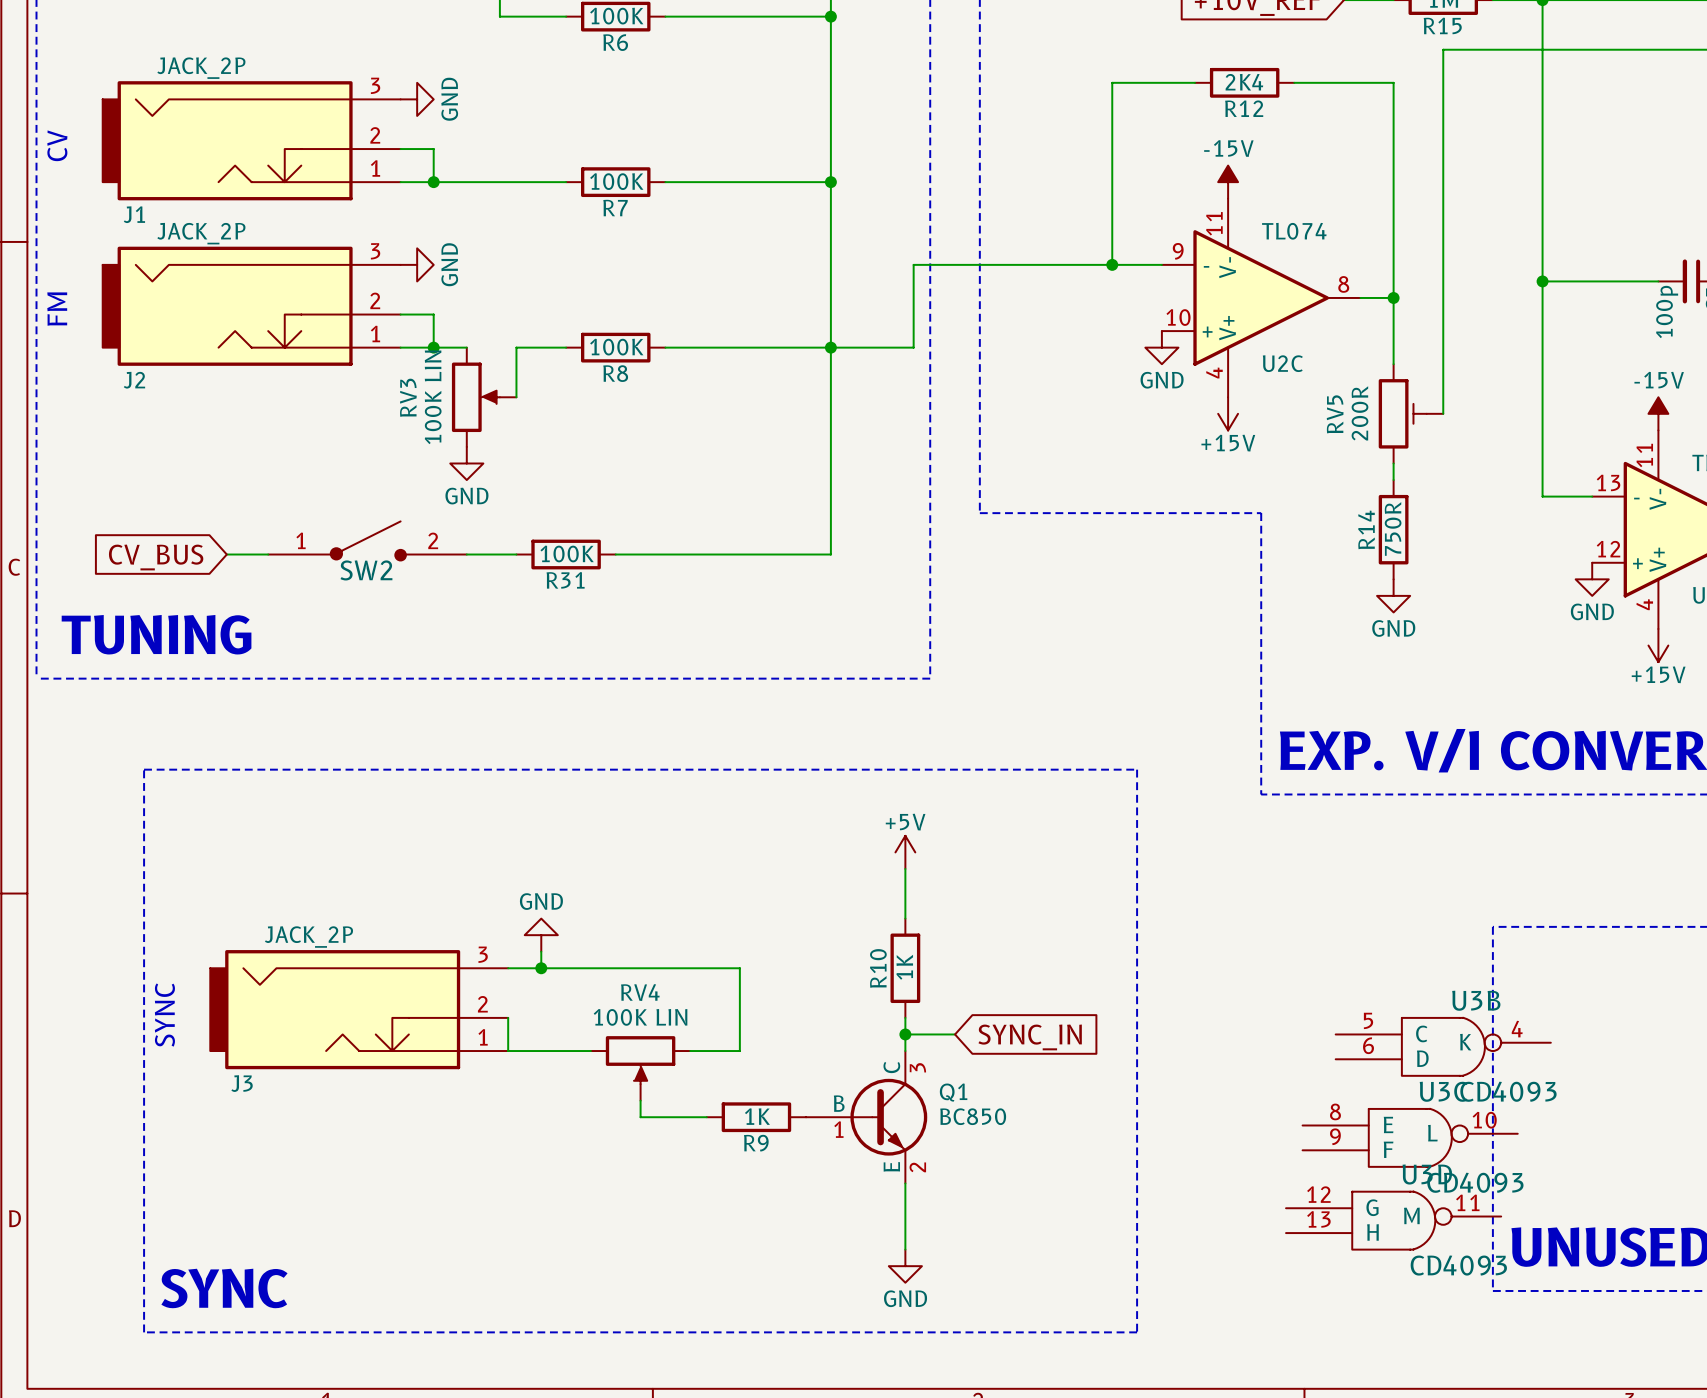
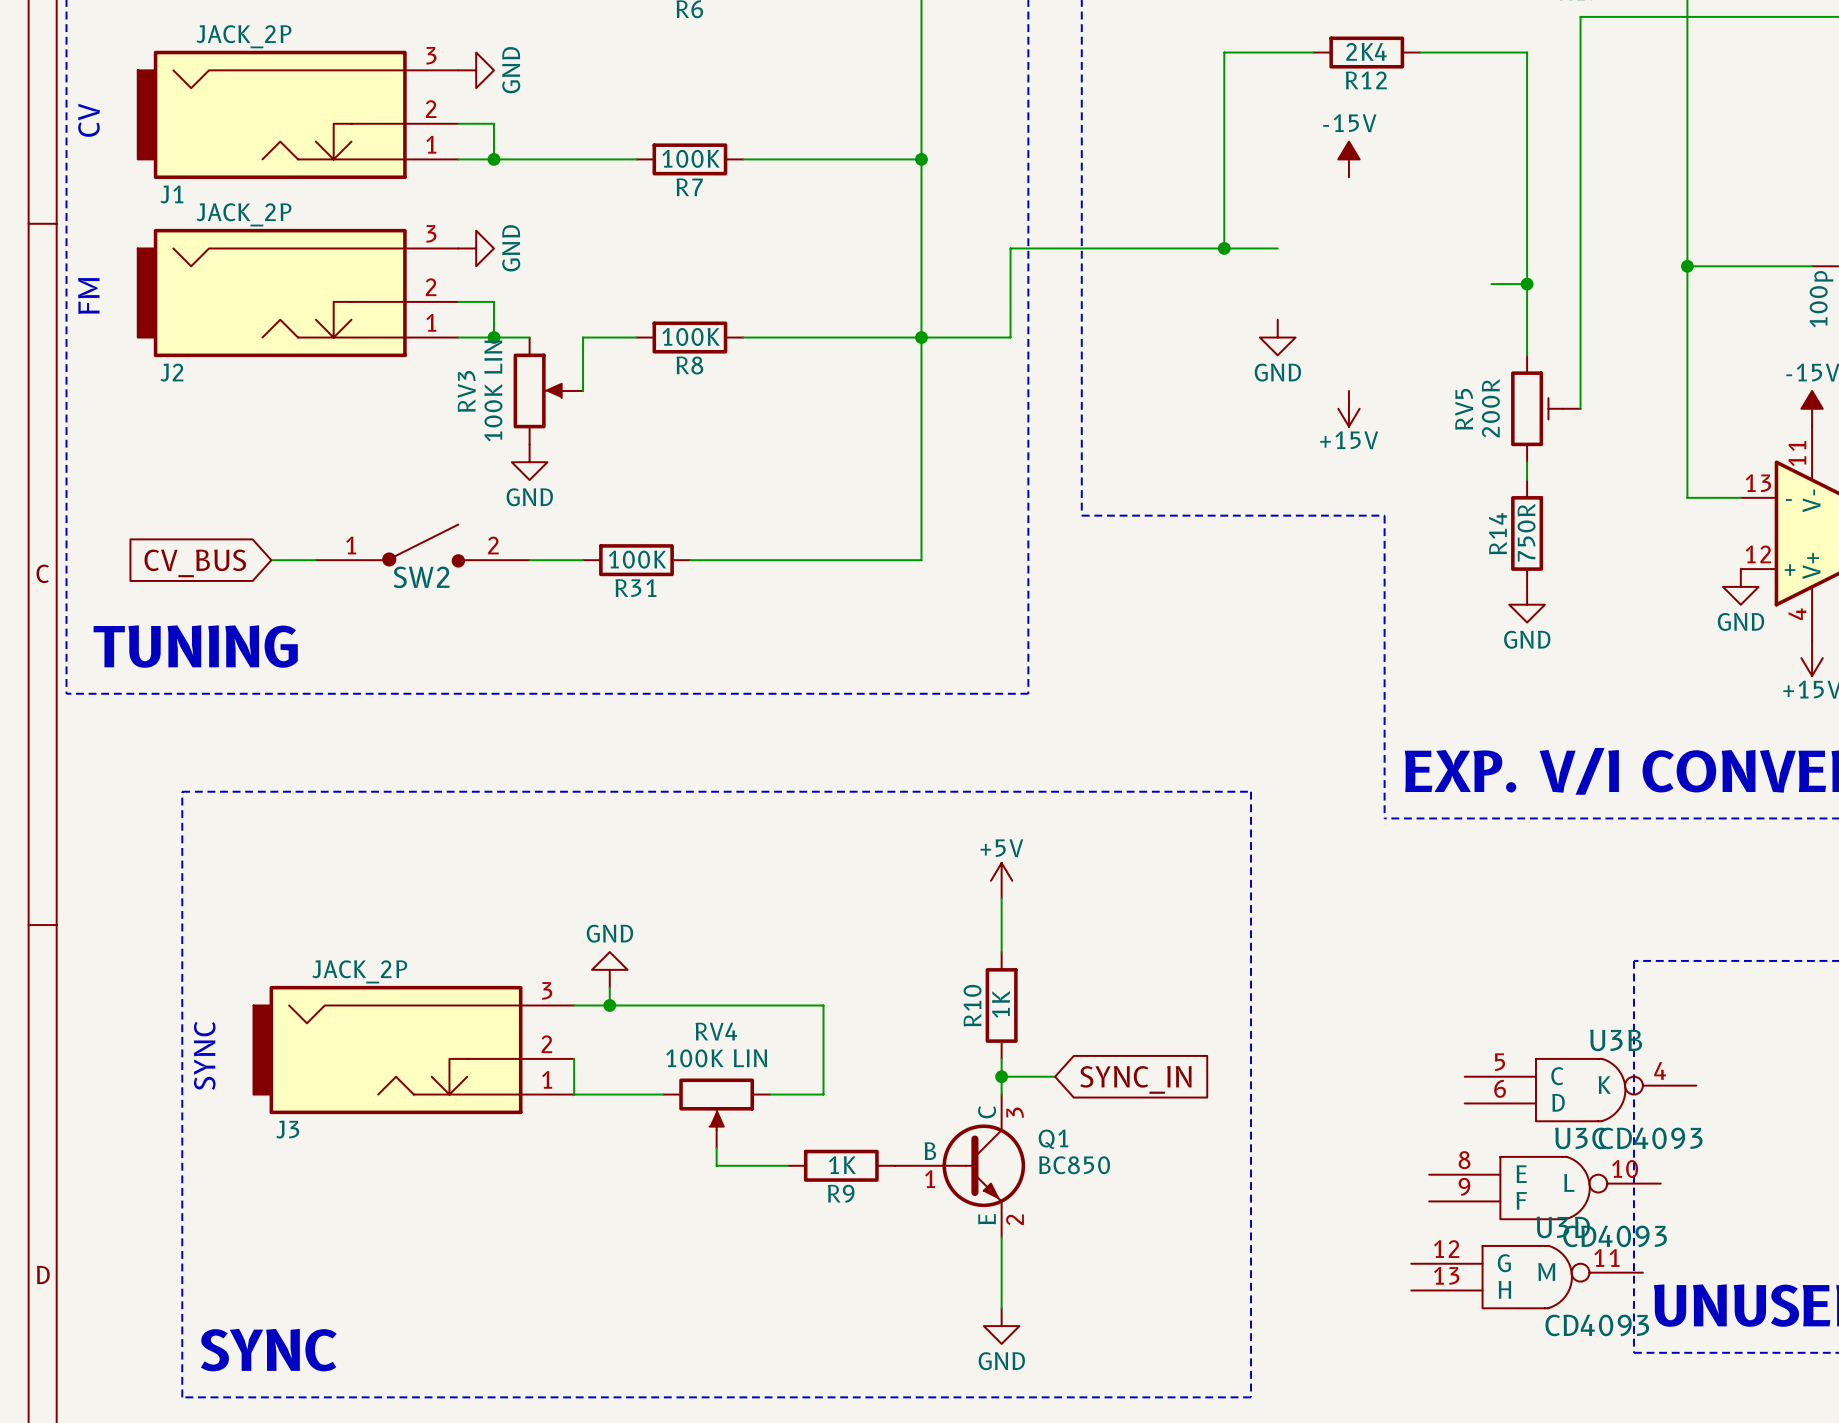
U2C: TL074 (1261, 297) -> none

